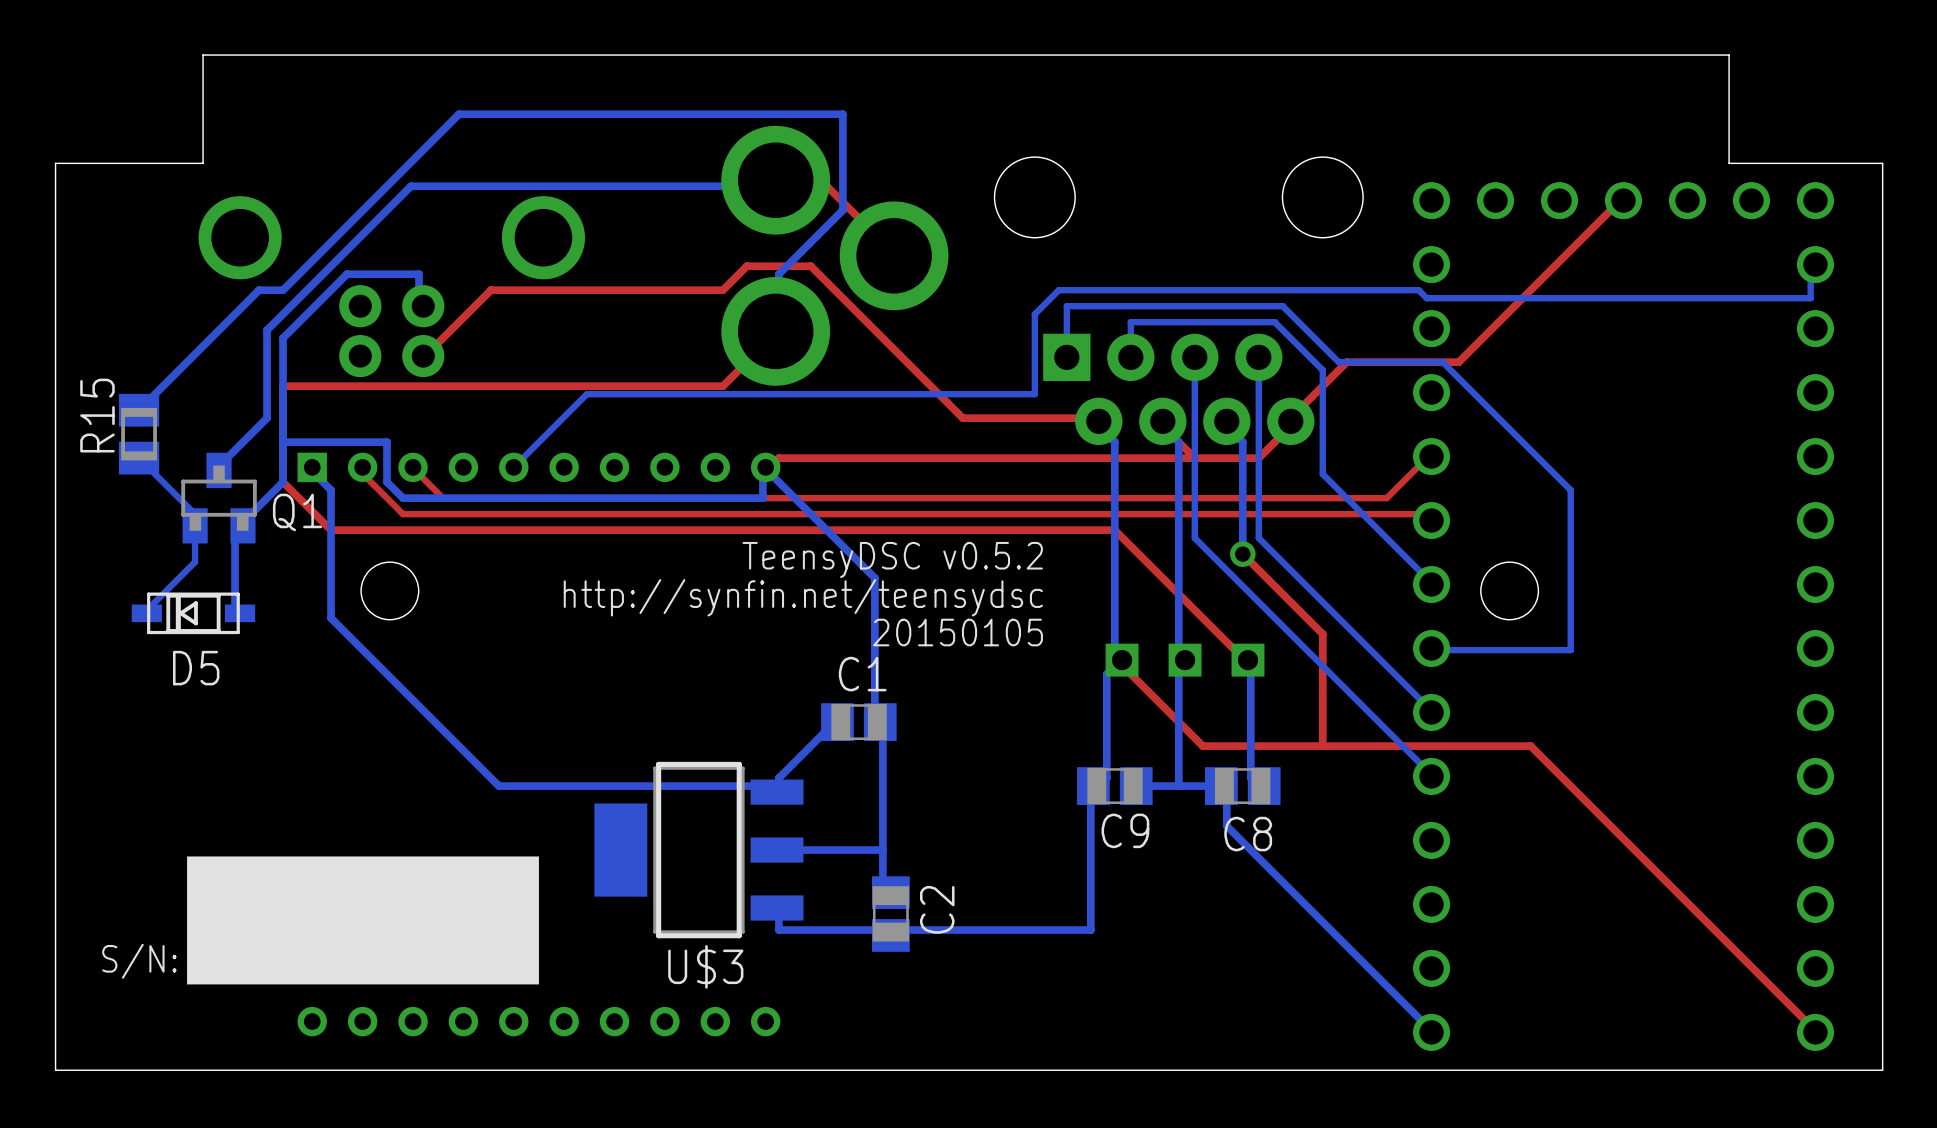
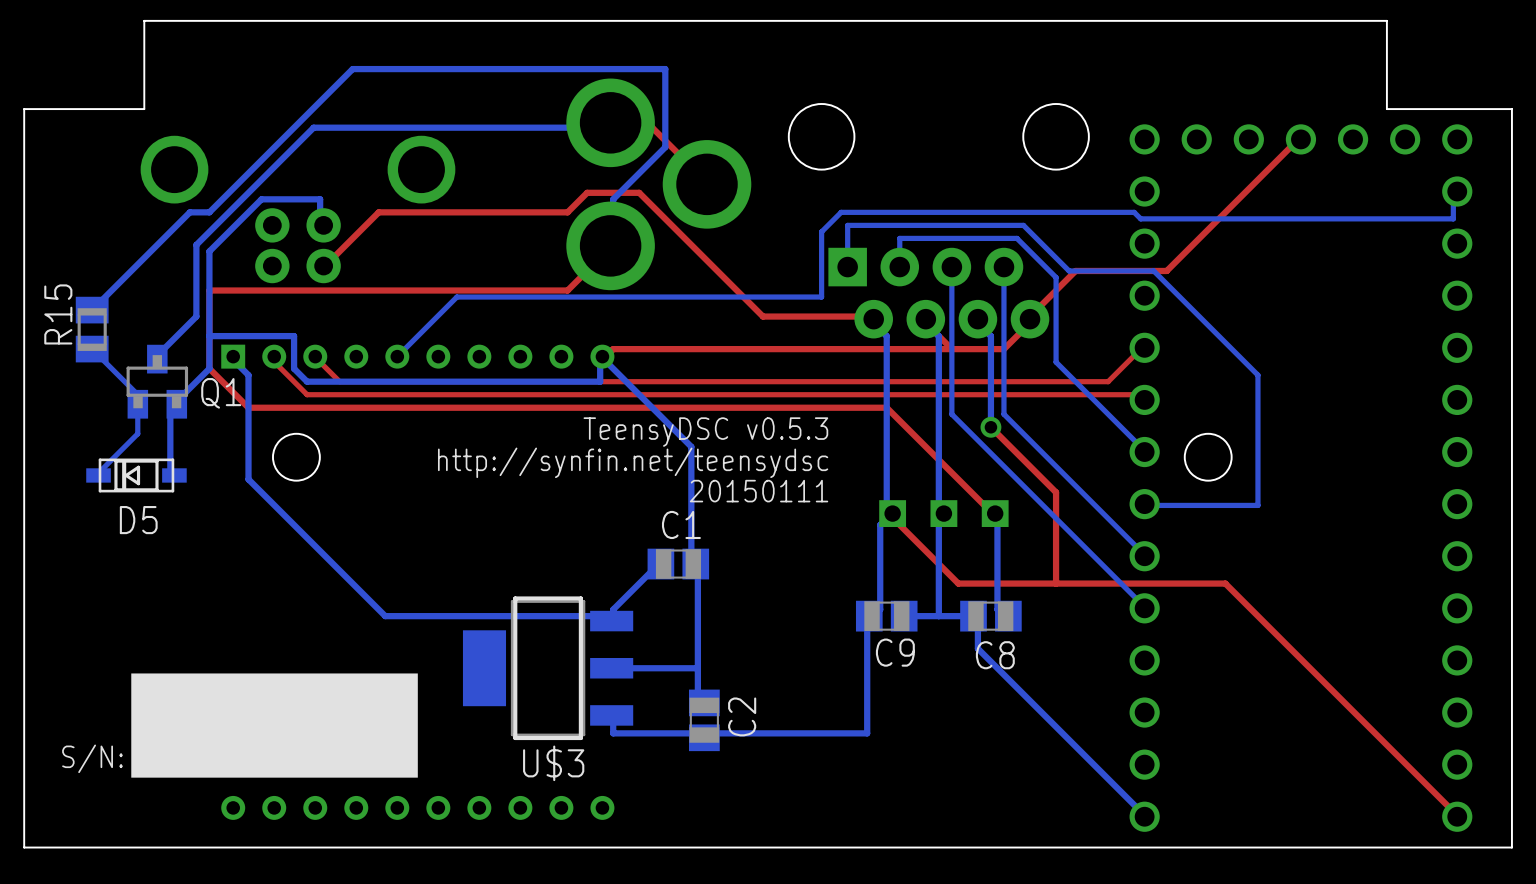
text: TeensyDSC v0.5.2 (892, 560) -> TeensyDSC v0.5.3 (705, 432)
text: 20150105 (958, 632) -> 20150111 (759, 491)

